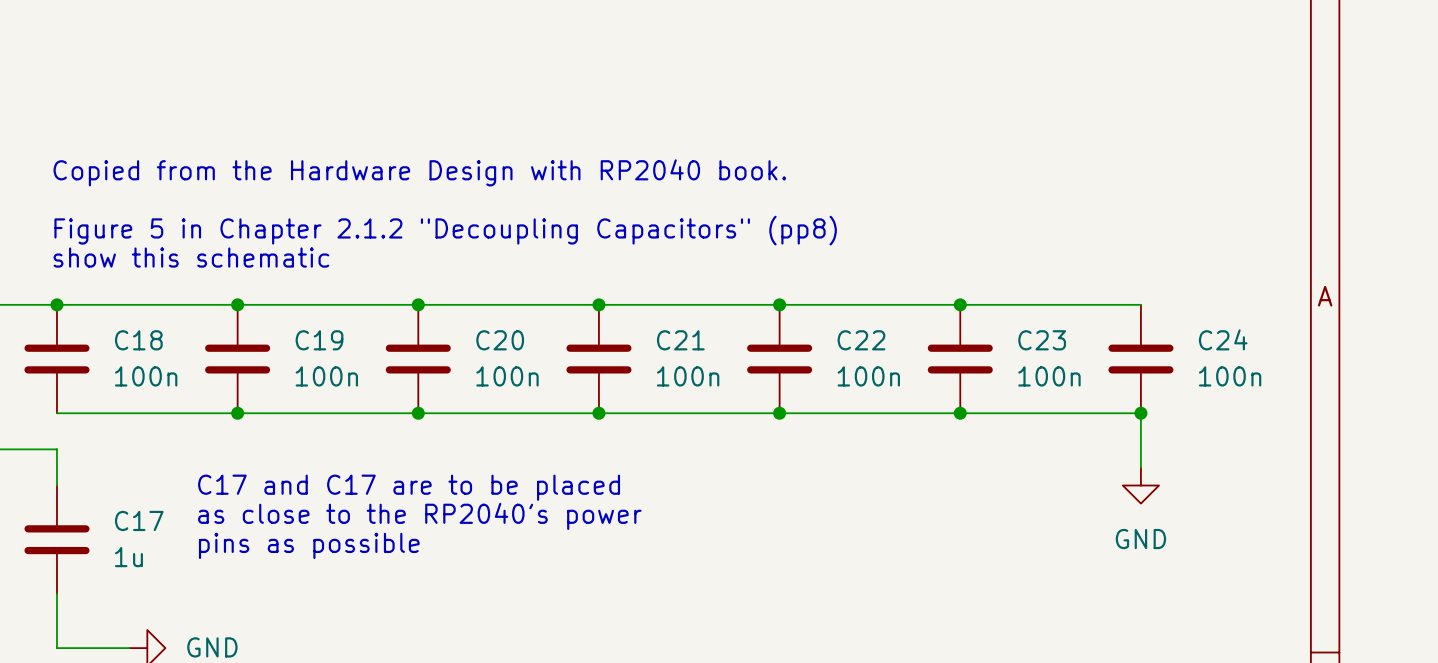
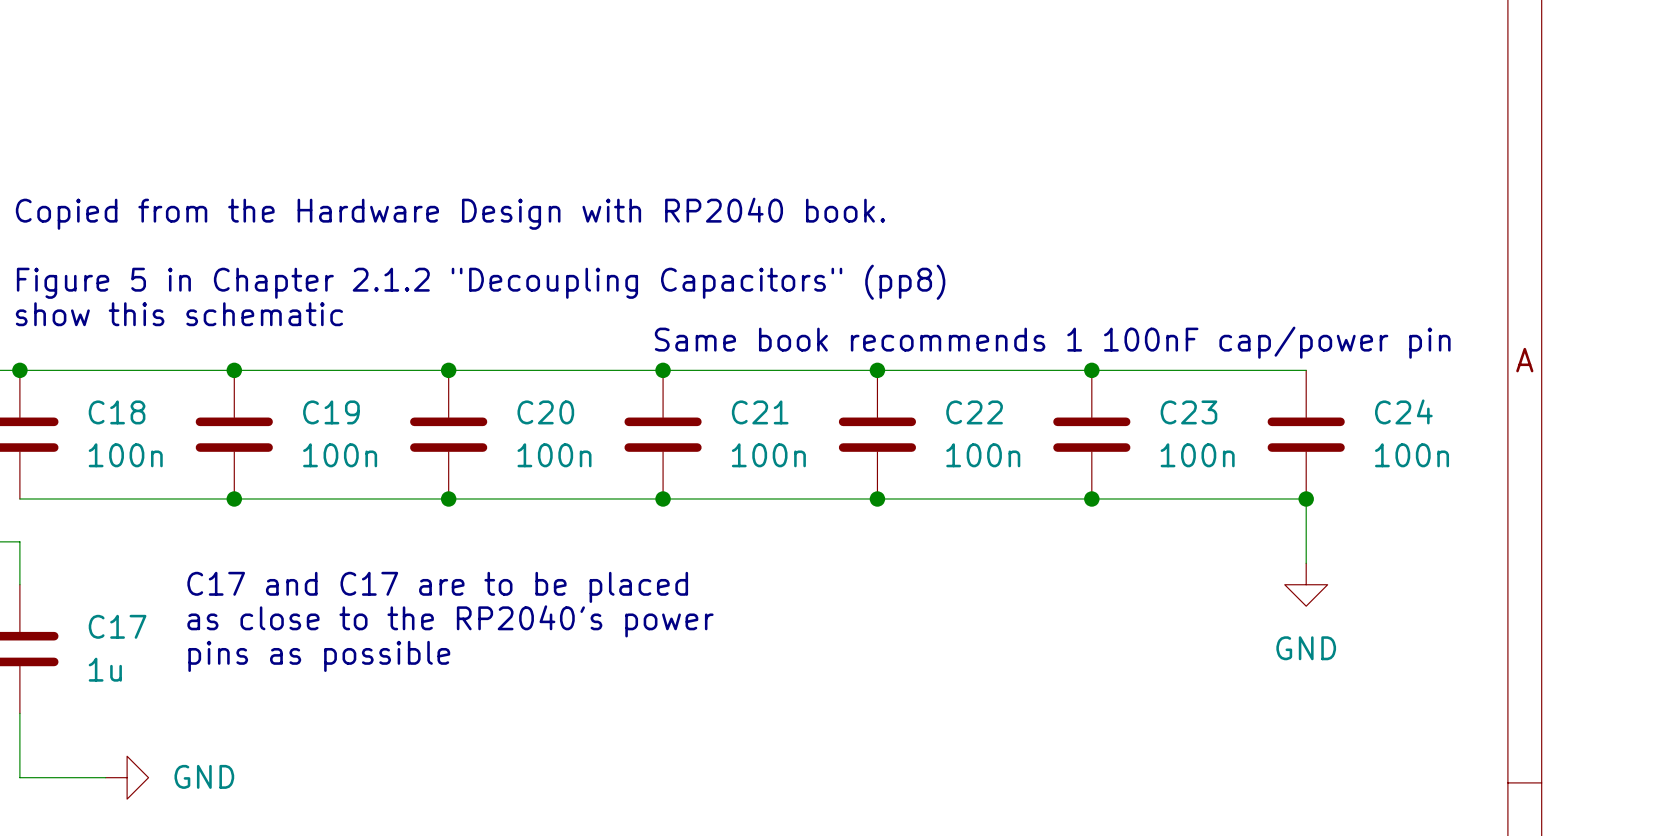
text: none -> Same book recommends 1 100nF cap/power pin (1052, 342)

